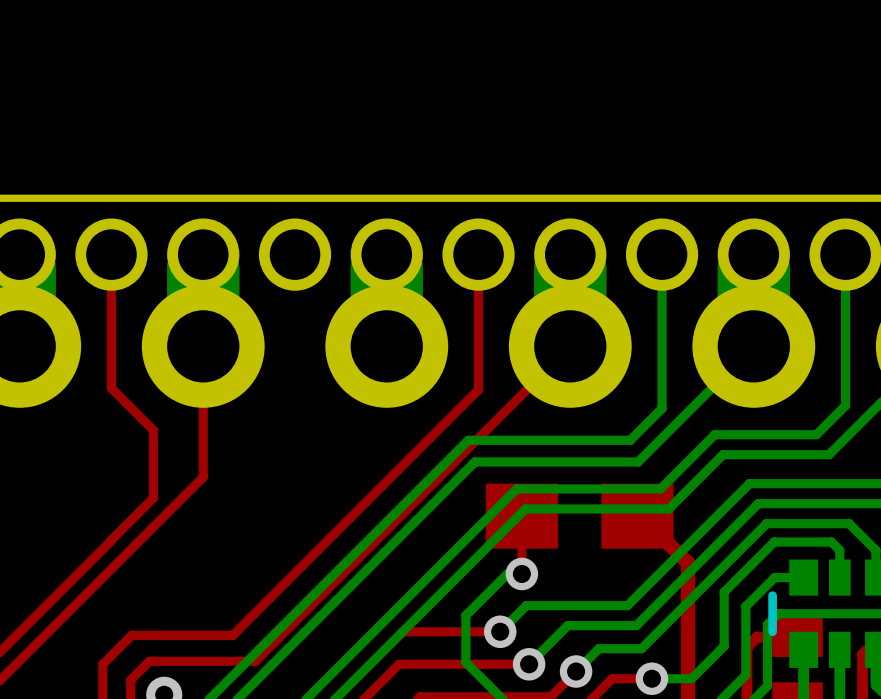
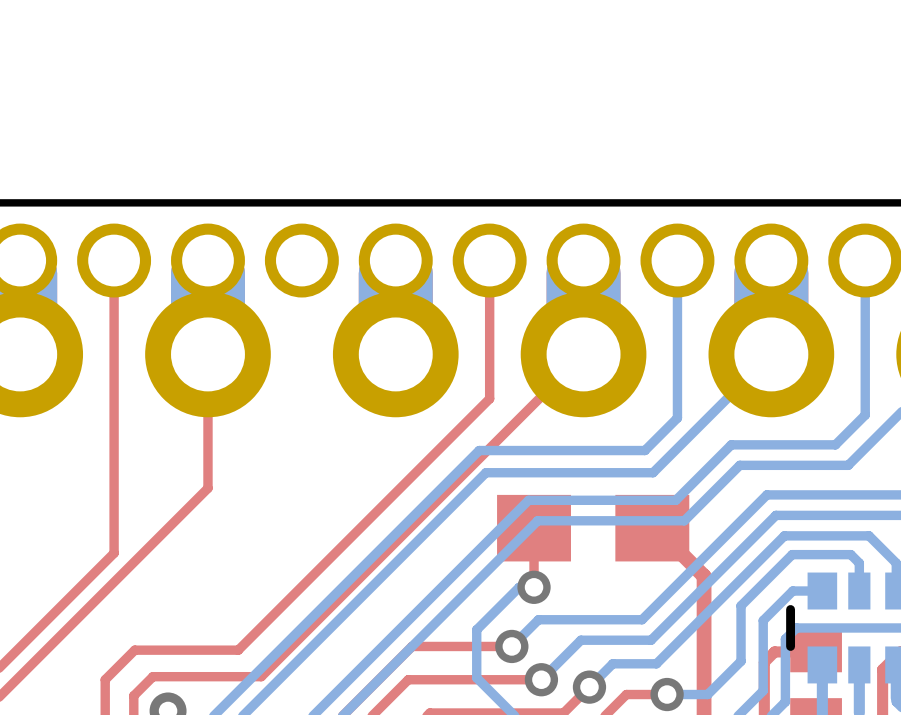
top track: (111, 388) (153, 430) (153, 498) (111, 540) -> (114, 397) (114, 552)

